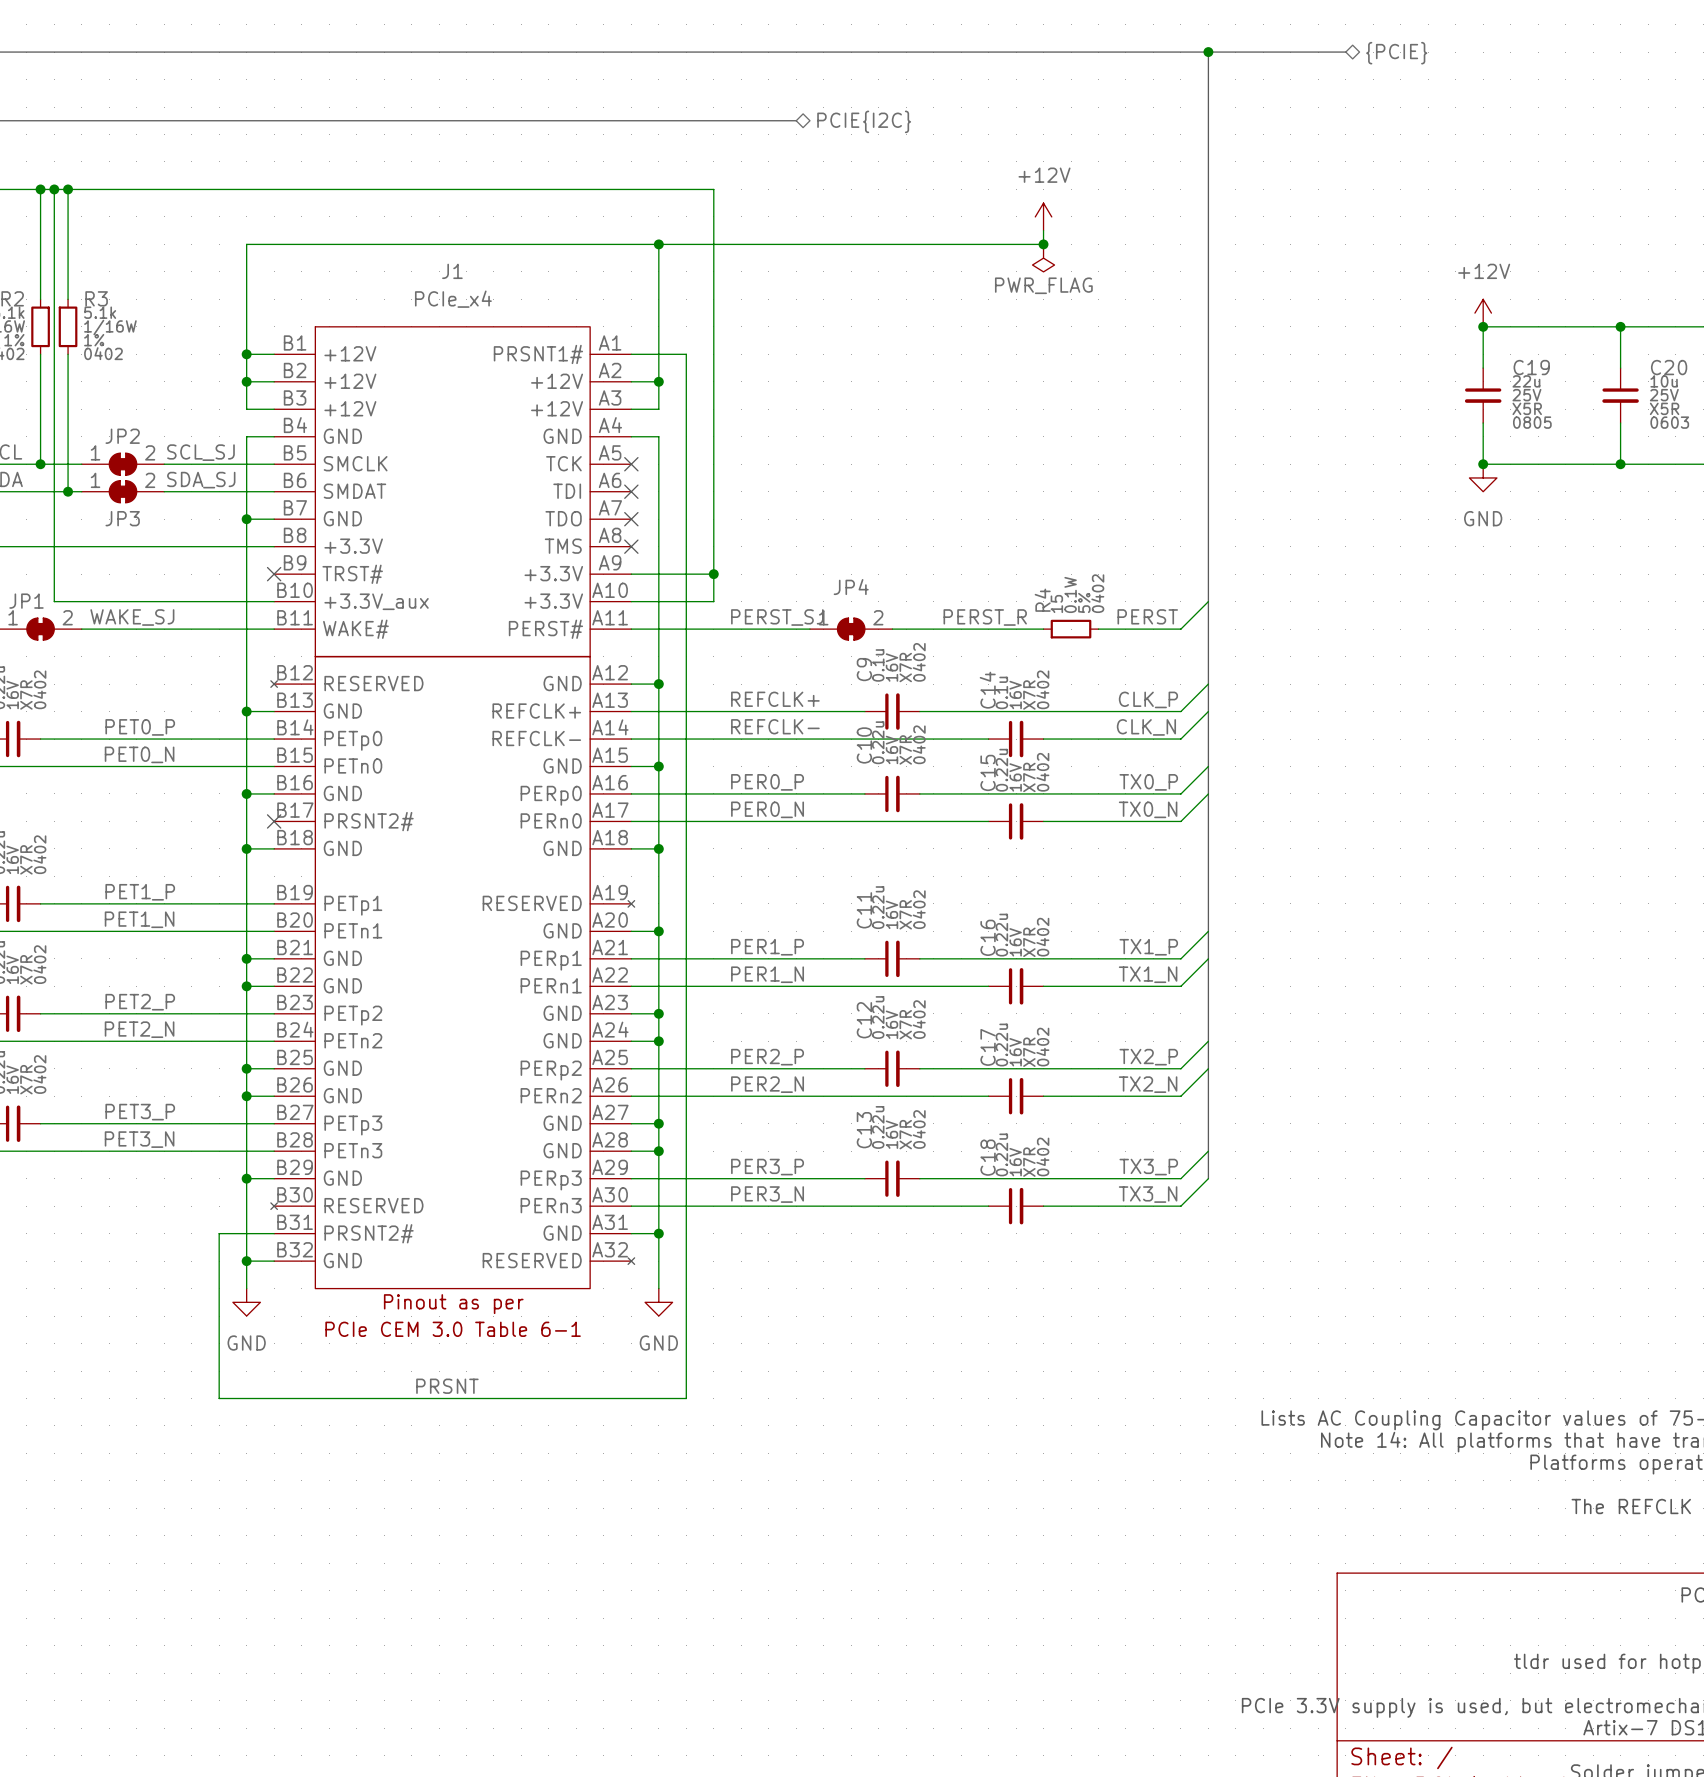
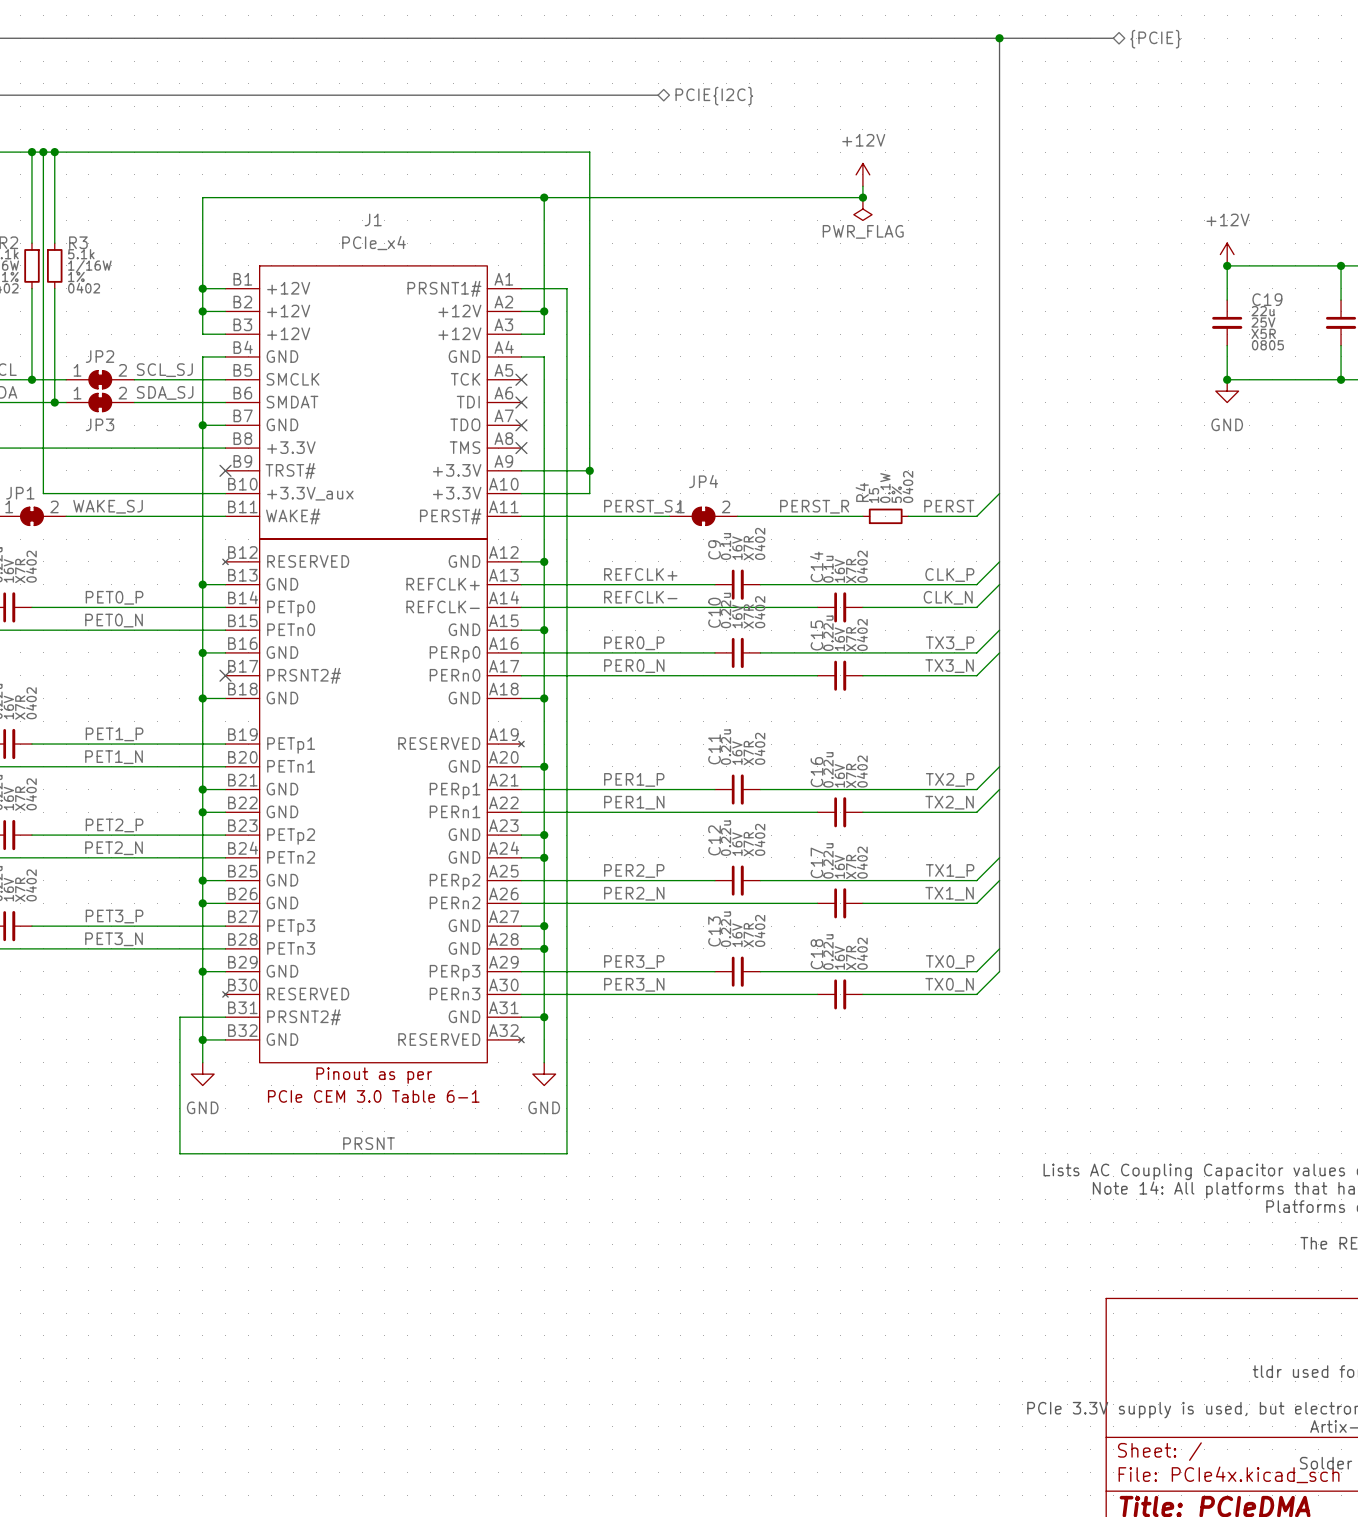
label: TX0_P (1148, 782) -> TX3_P (950, 643)
label: TX0_N (1148, 809) -> TX3_N (949, 666)
label: TX1_P (1148, 947) -> TX2_P (950, 779)
label: TX1_N (1148, 974) -> TX2_N (949, 802)
label: TX2_P (1148, 1057) -> TX1_P (950, 870)
label: TX2_N (1148, 1084) -> TX1_N (949, 893)
label: TX3_P (1148, 1167) -> TX0_P (950, 962)
label: TX3_N (1148, 1194) -> TX0_N (949, 984)

